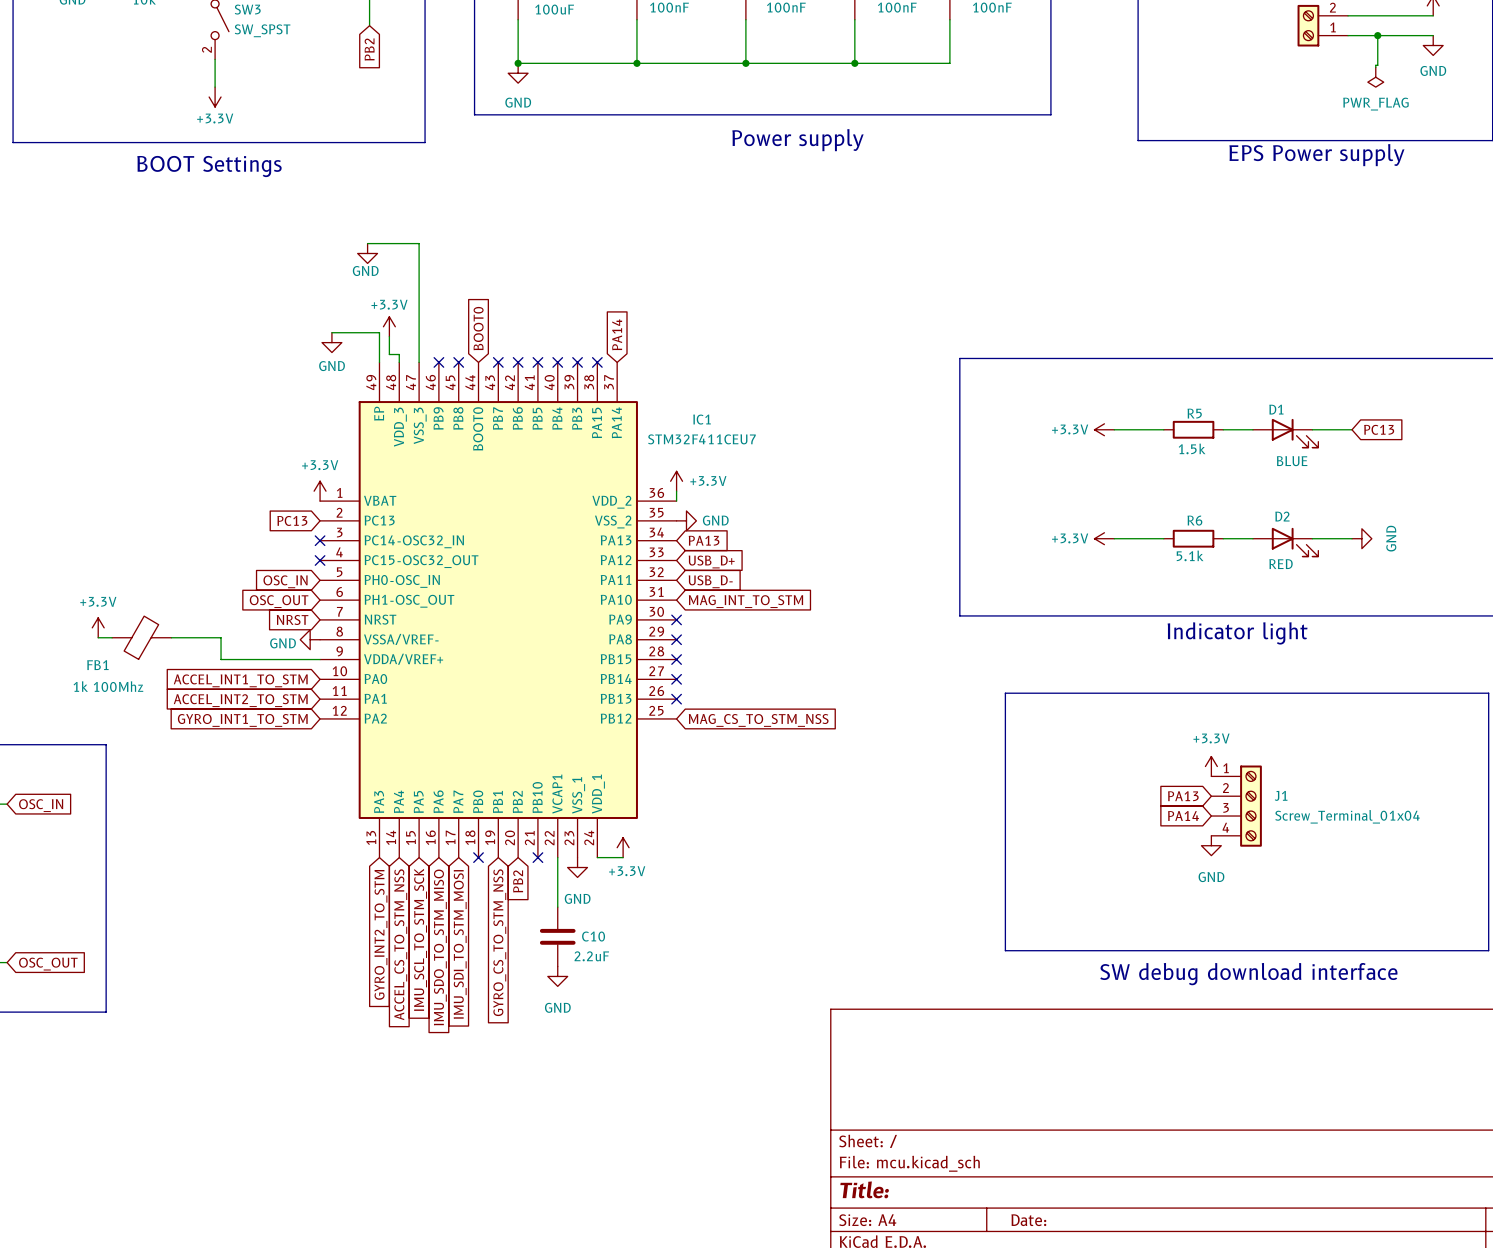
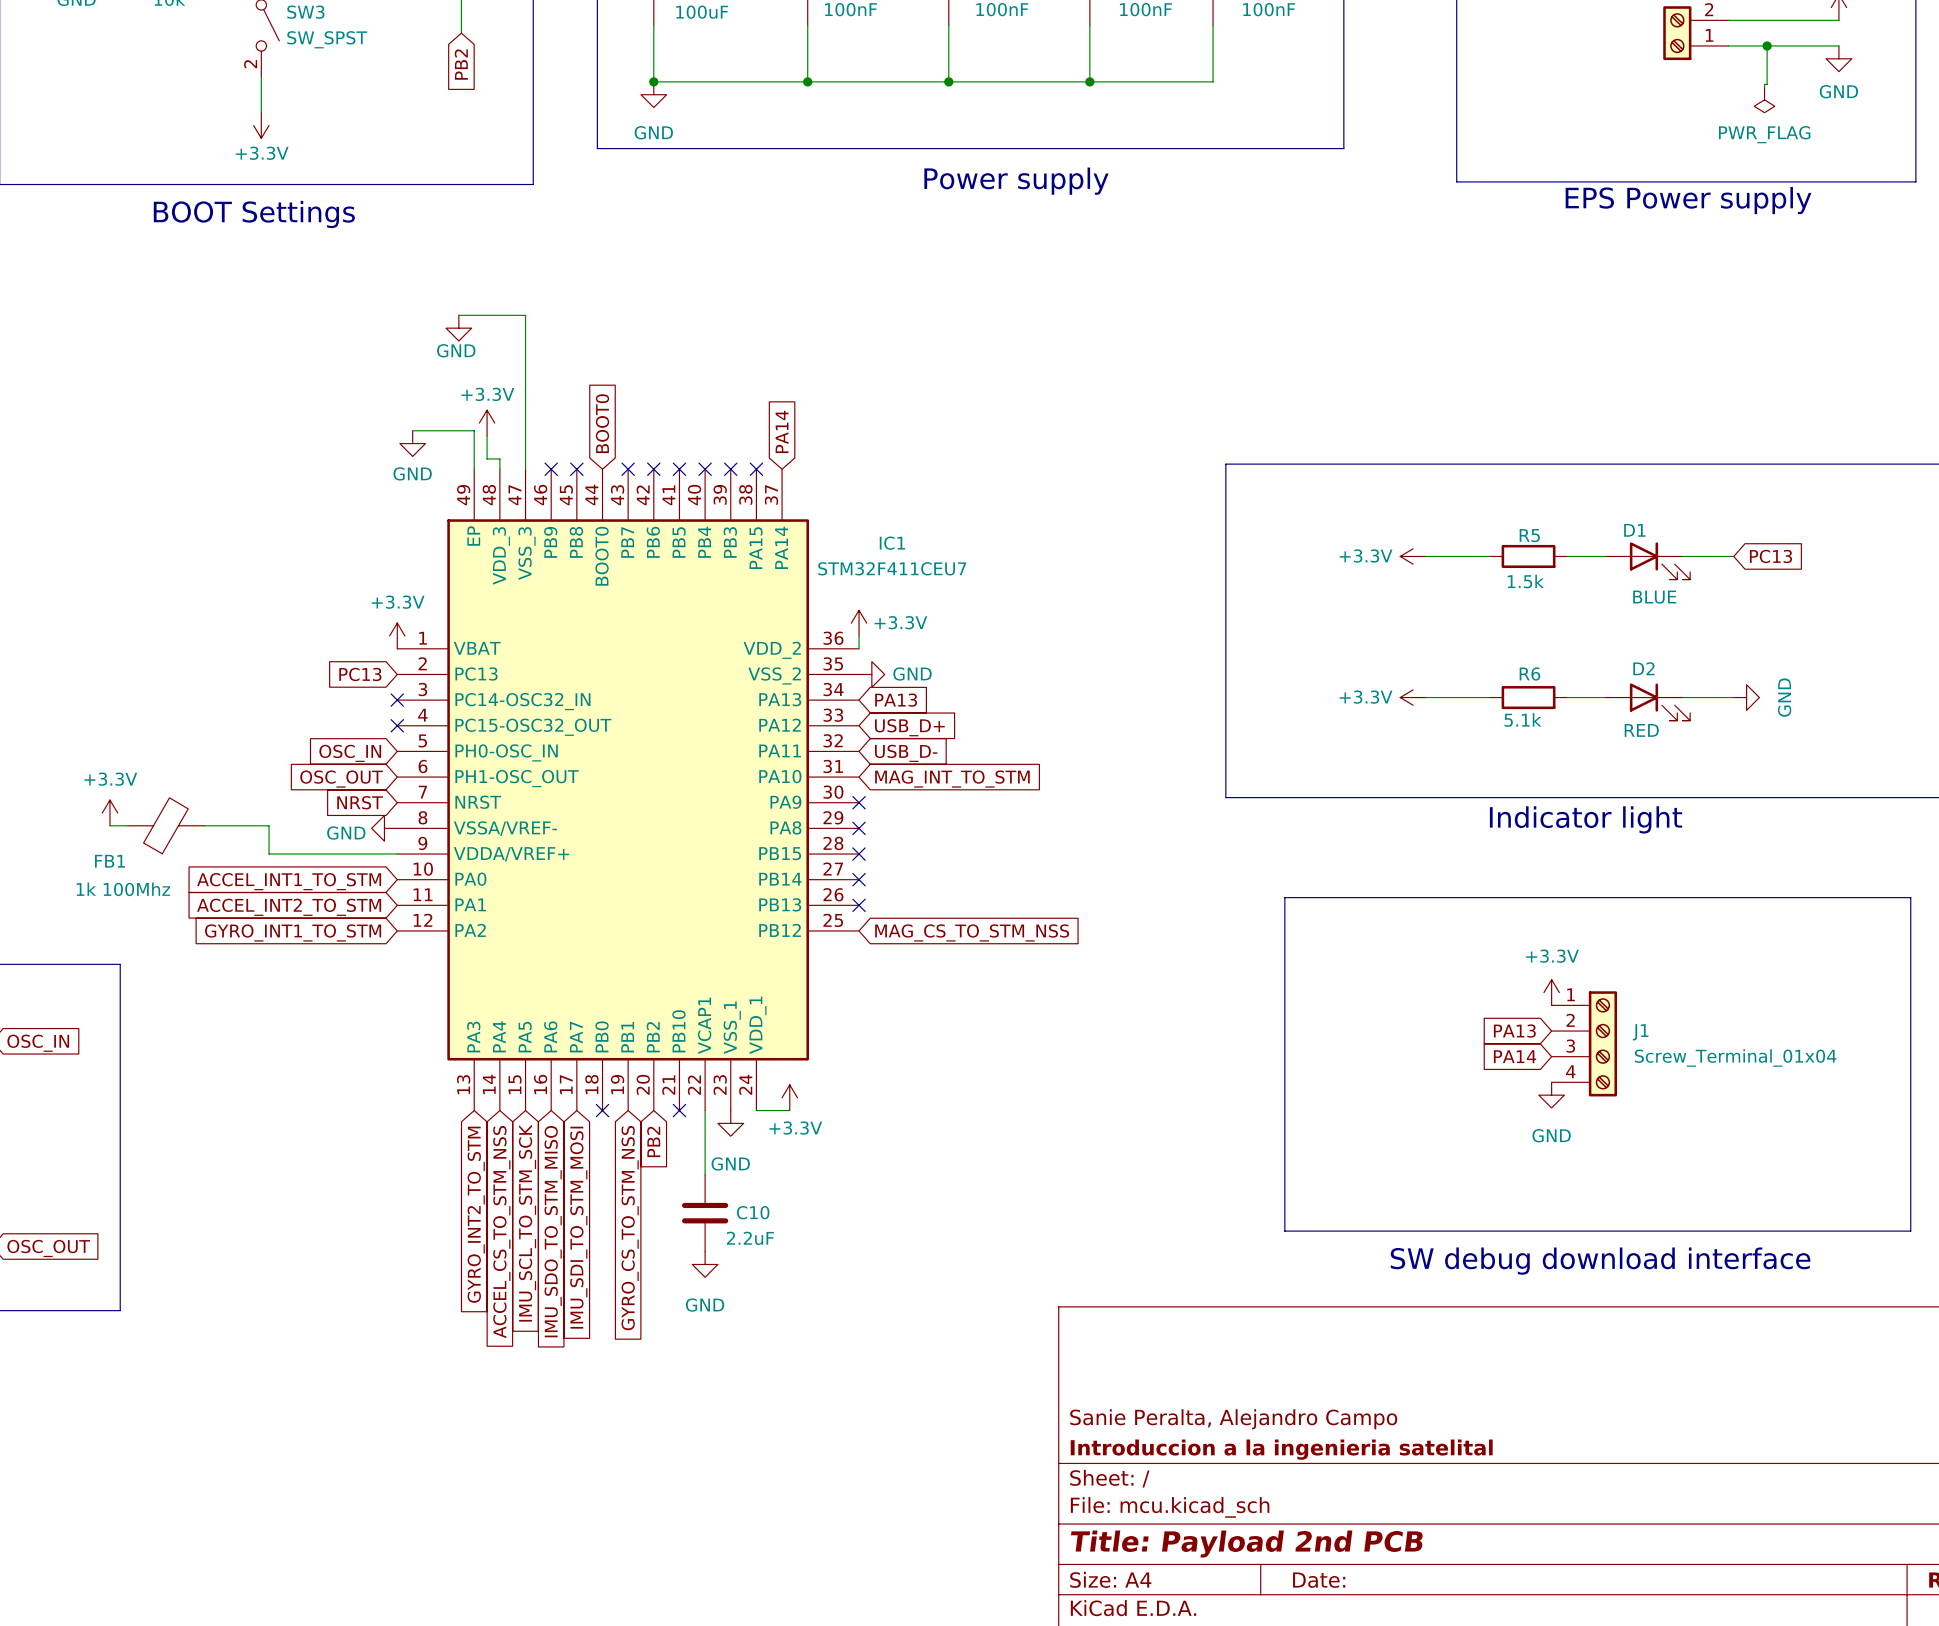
title block: none -> Sanie Peralta, Alejandro Campo (1233, 1419)
title block: none -> Introduccion a la ingenieria satelital (1281, 1449)
title block: Title: (864, 1189) -> Title: Payload 2nd PCB (1246, 1544)

